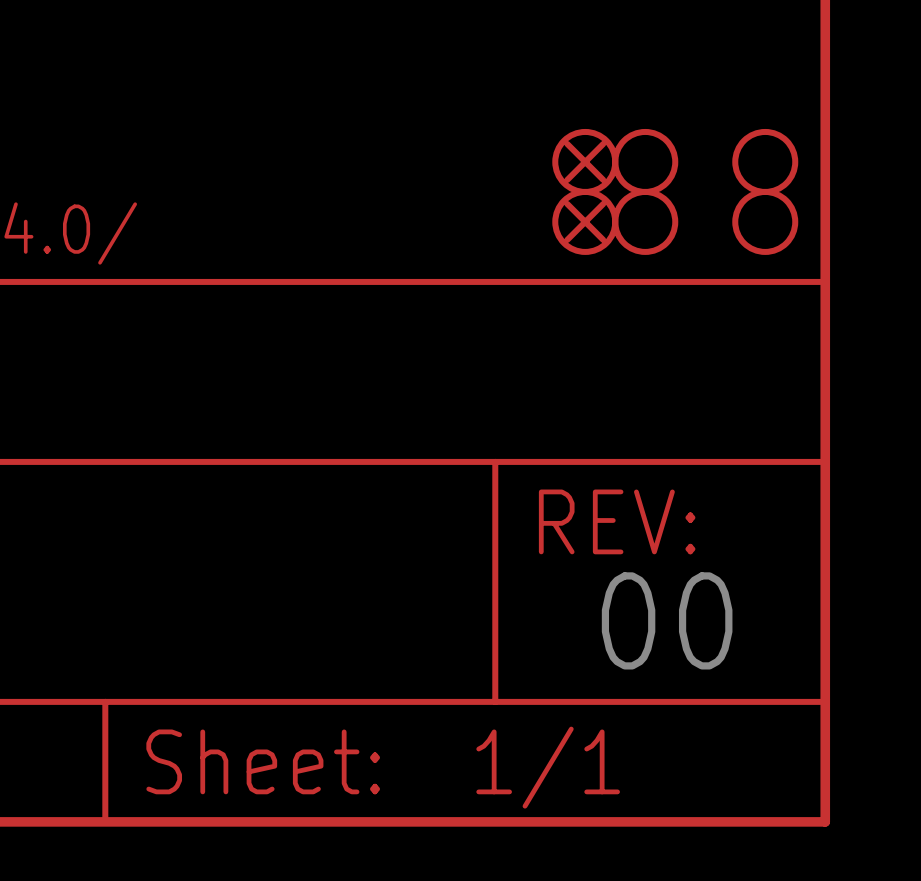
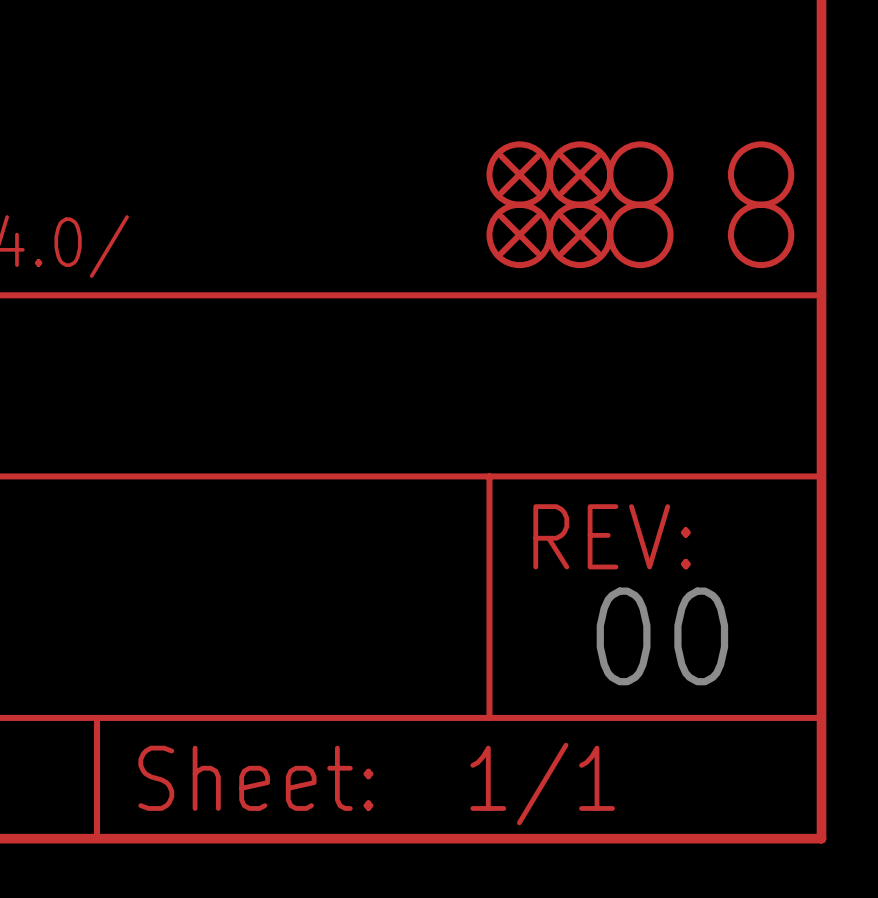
part: none -> (519, 174)
part: none -> (519, 234)

